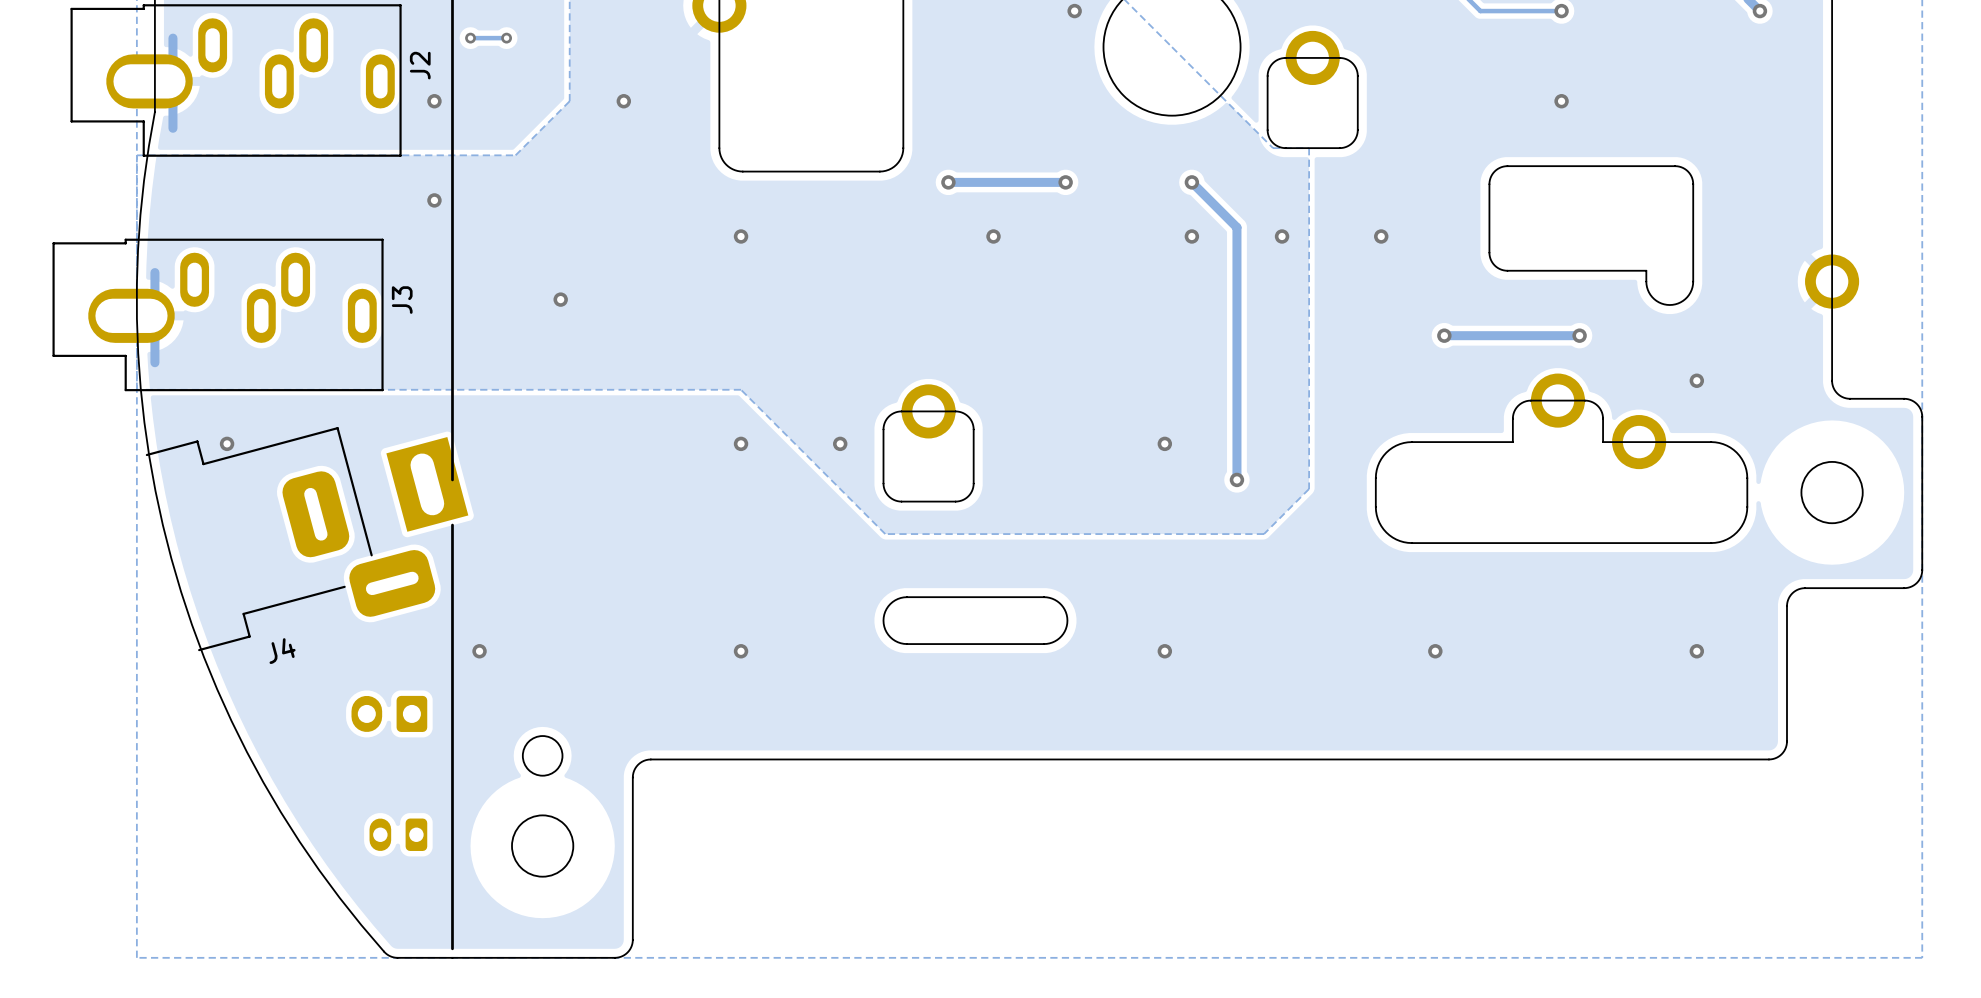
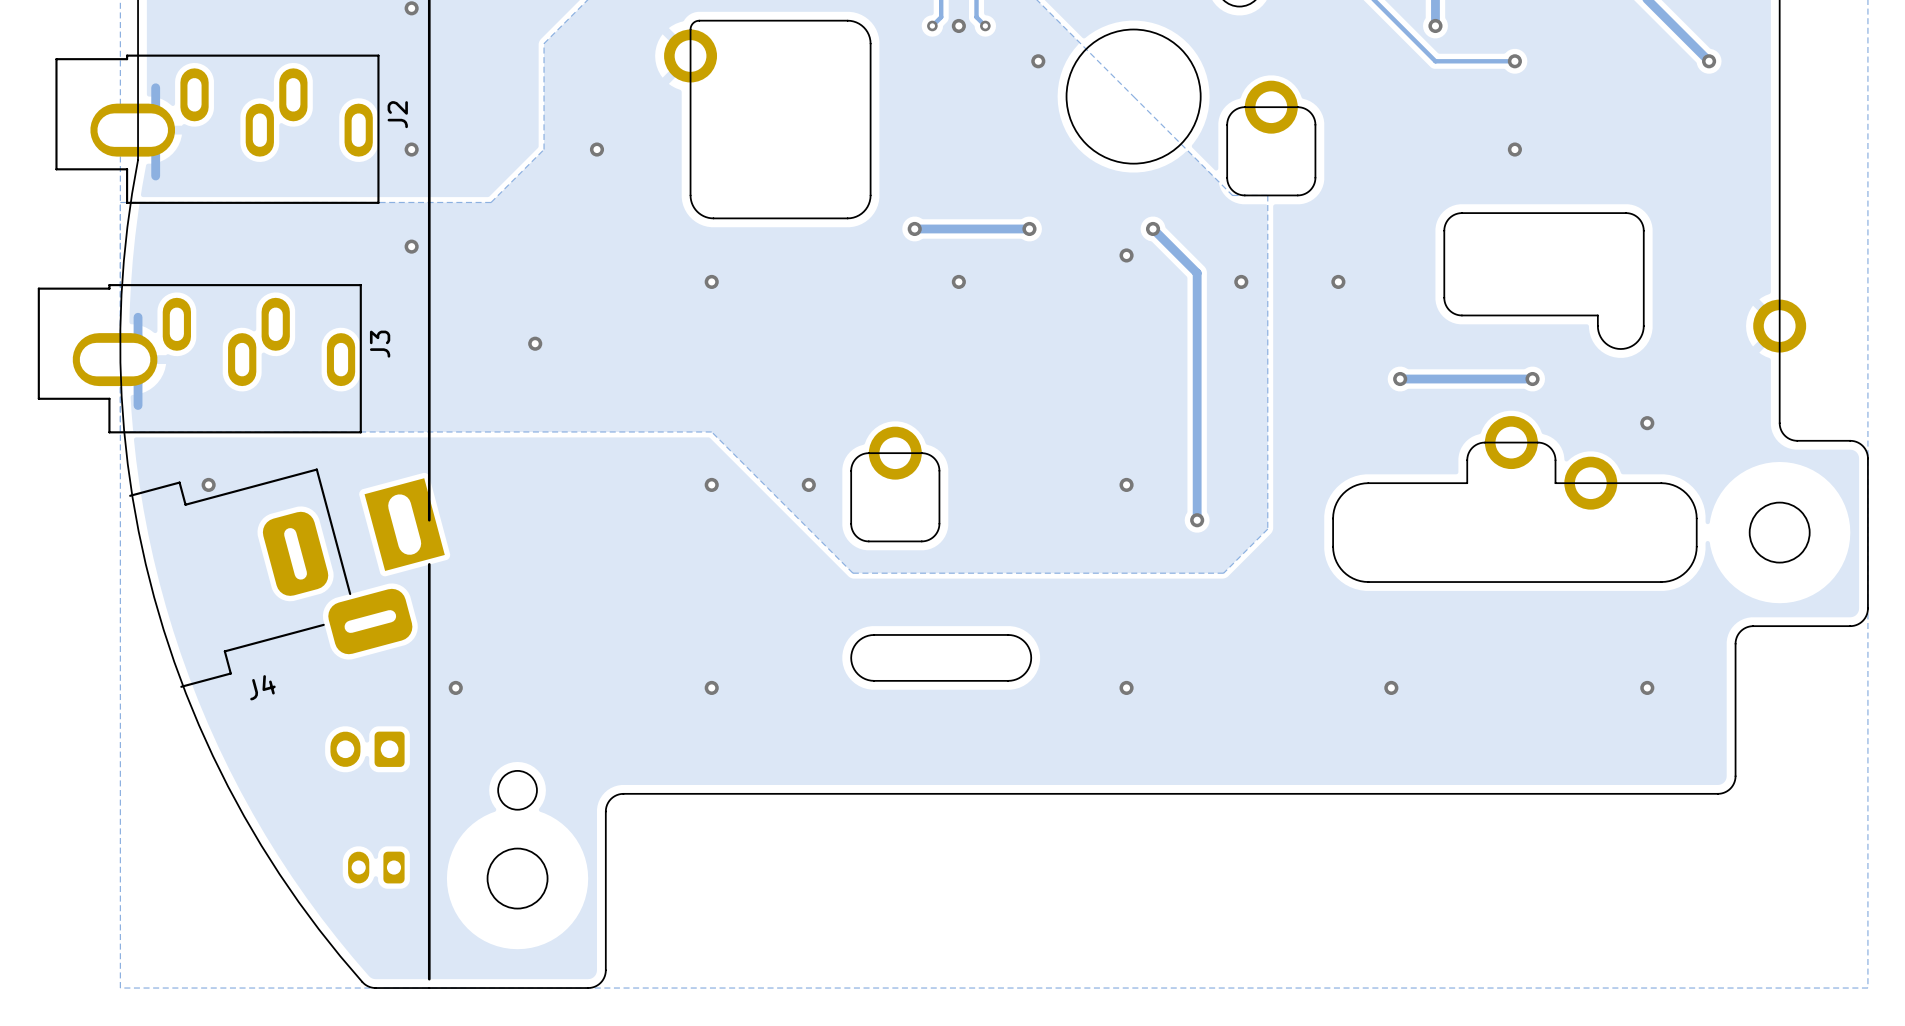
via: (470, 38) -> none
track: (506, 38) (470, 38) -> none
via: (506, 38) -> none
via position: (1191, 236) -> (1126, 255)

